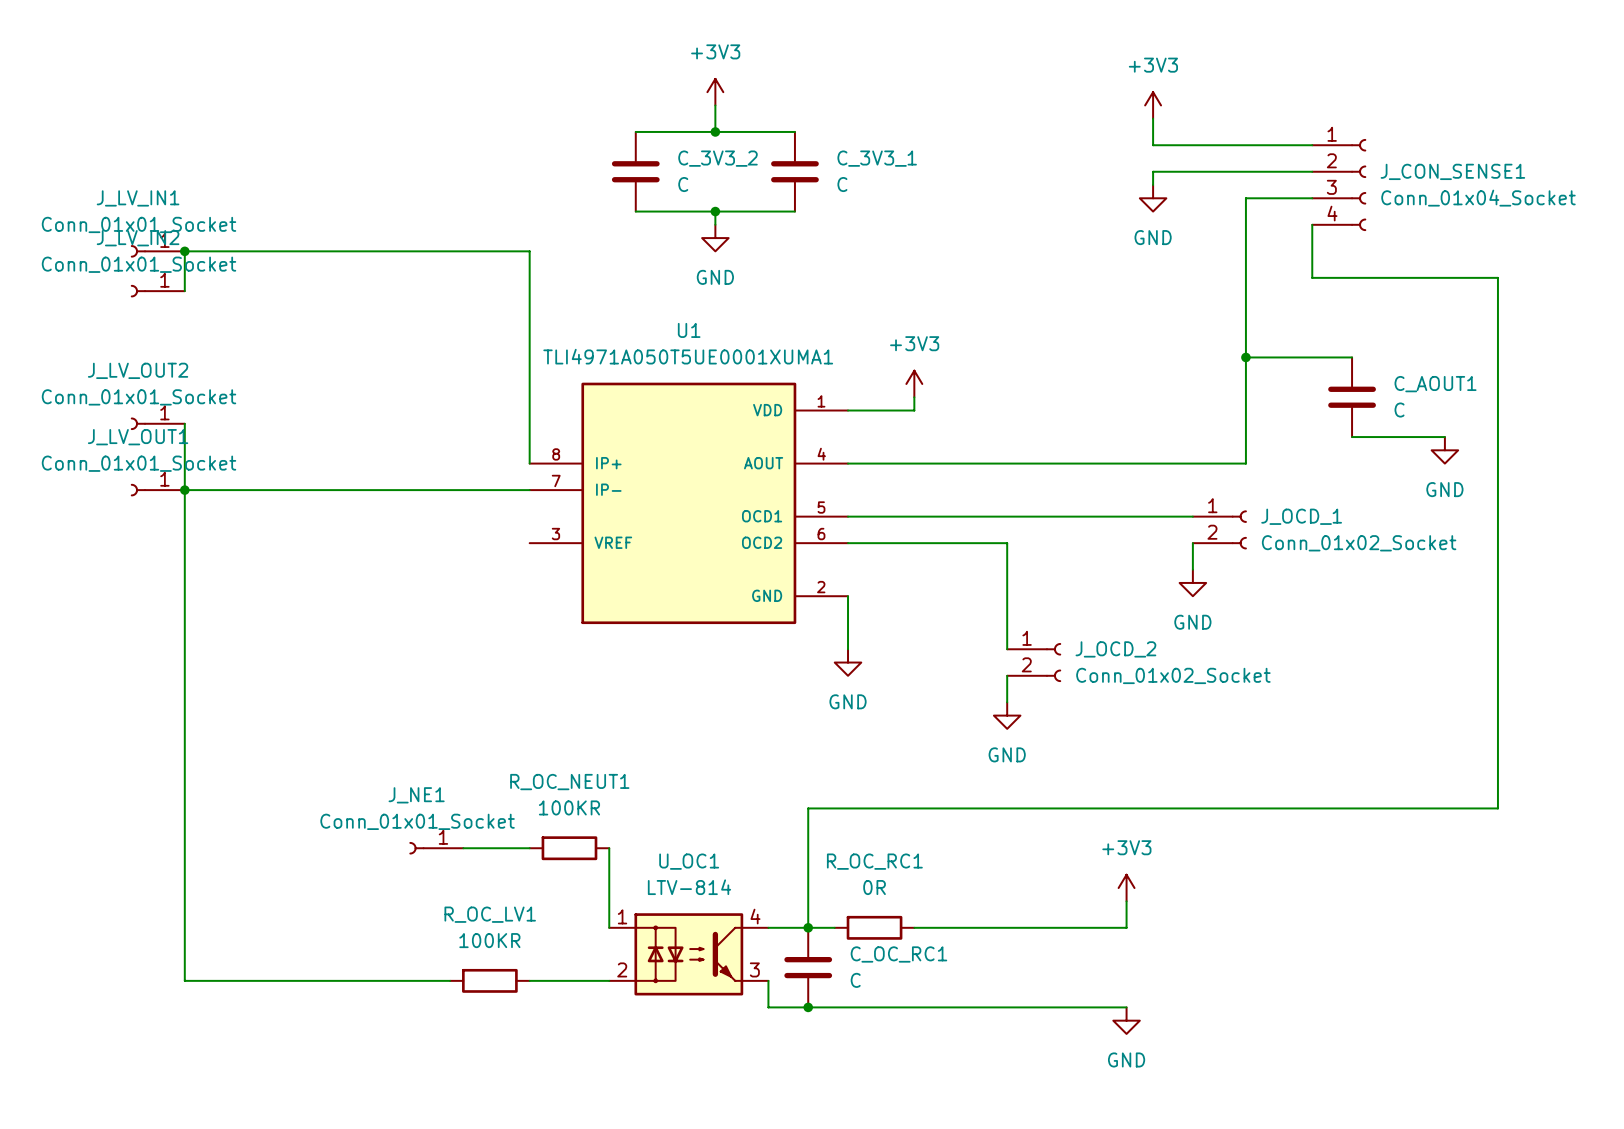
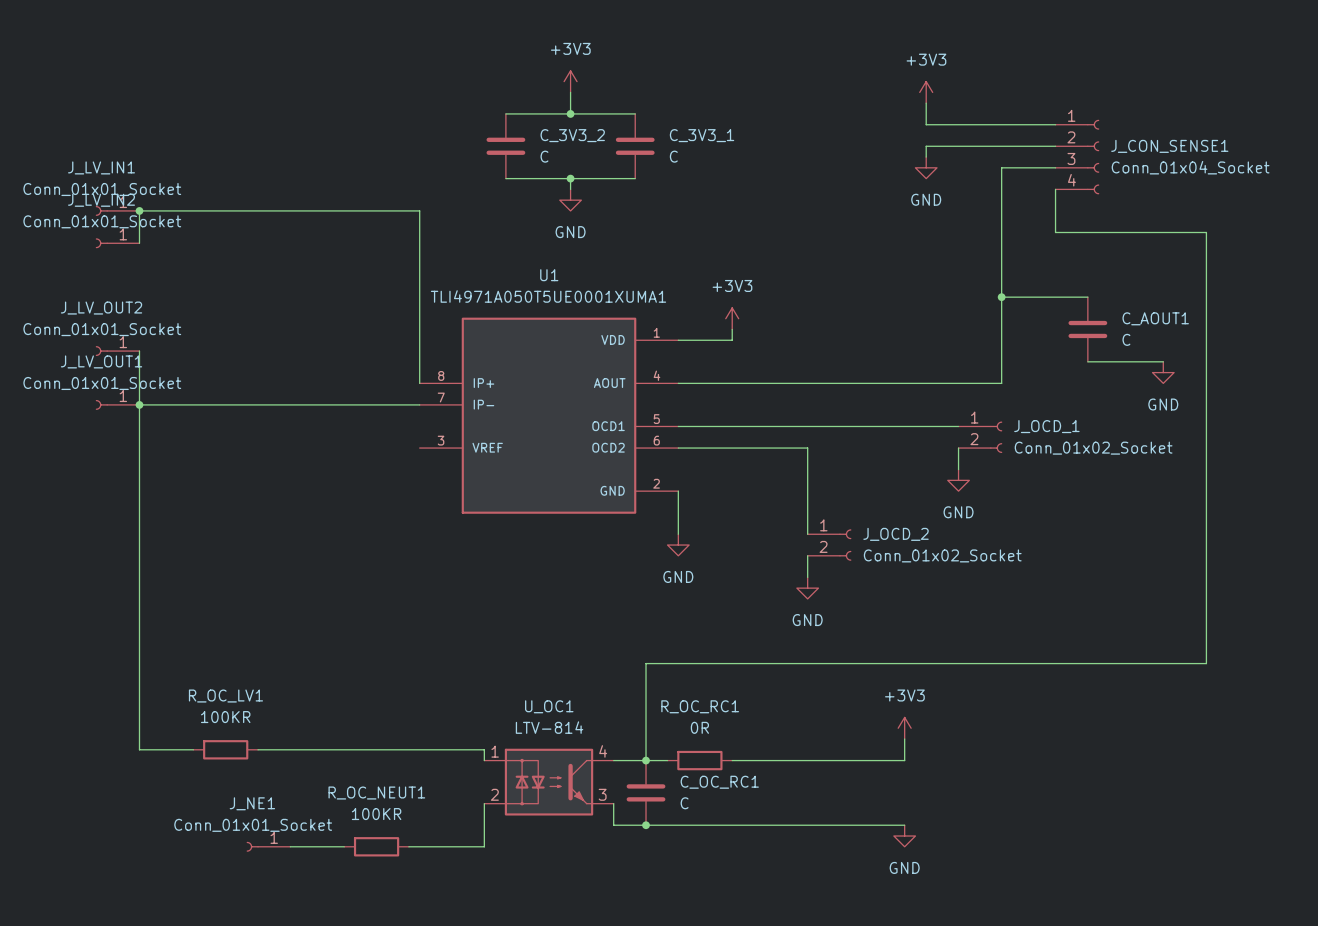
J_NE1 position: (436, 848) -> (268, 846)
wire: (463, 848) (529, 848) -> (290, 846) (344, 846)
R_OC_NEUT1 position: (569, 848) -> (376, 846)
wire: (609, 848) (609, 914) -> (258, 749) (484, 749)
wire: (184, 914) (184, 980) (450, 980) -> (139, 749) (193, 749)
R_OC_LV1 position: (489, 980) -> (225, 749)
wire: (529, 980) (609, 980) -> (408, 846) (484, 846) (484, 803)

